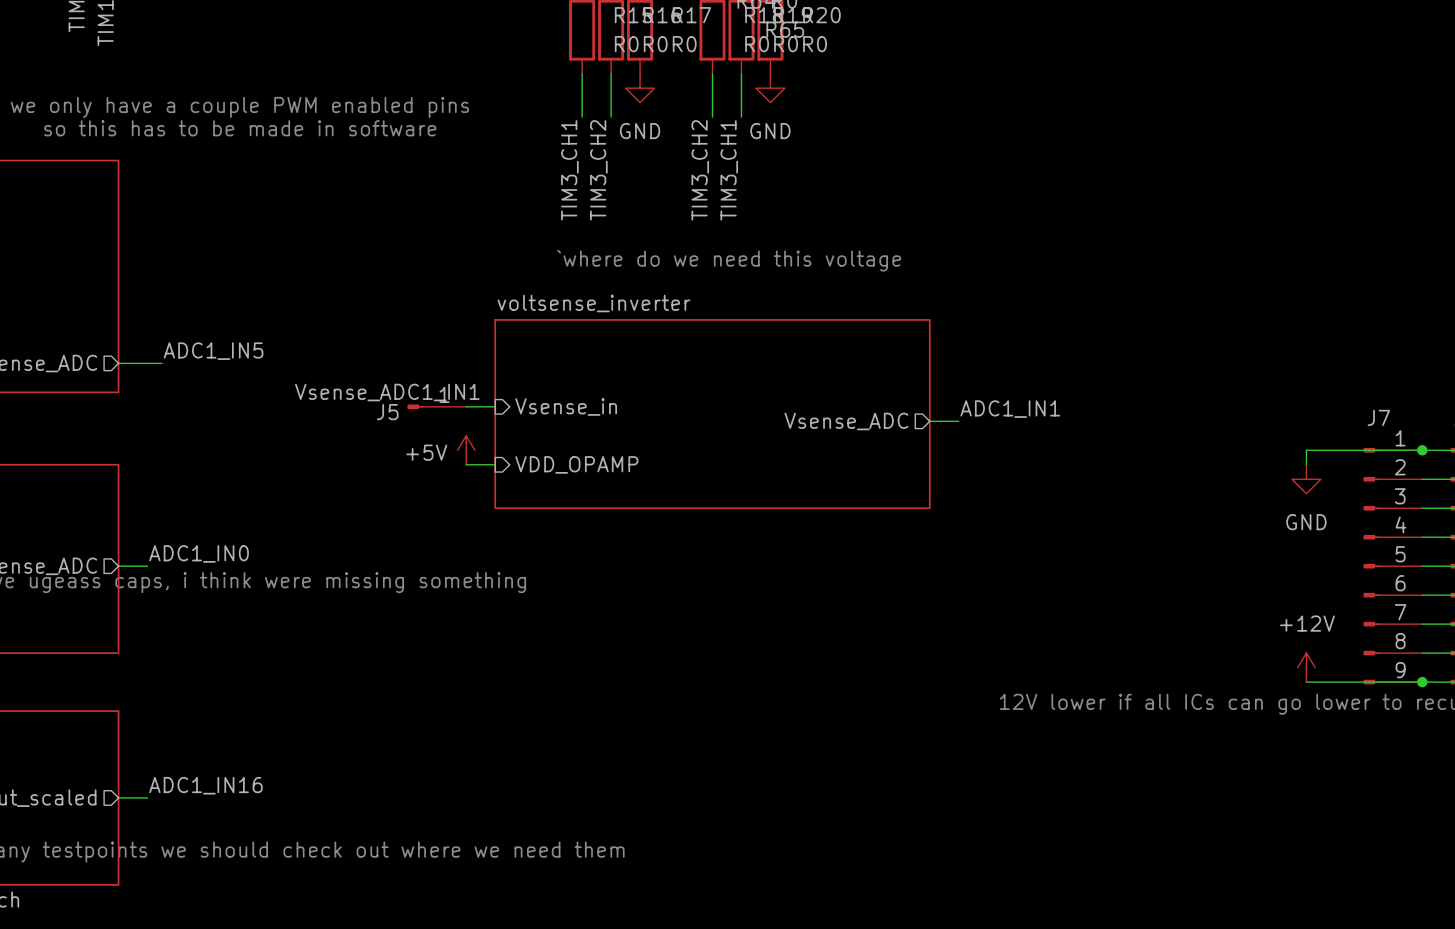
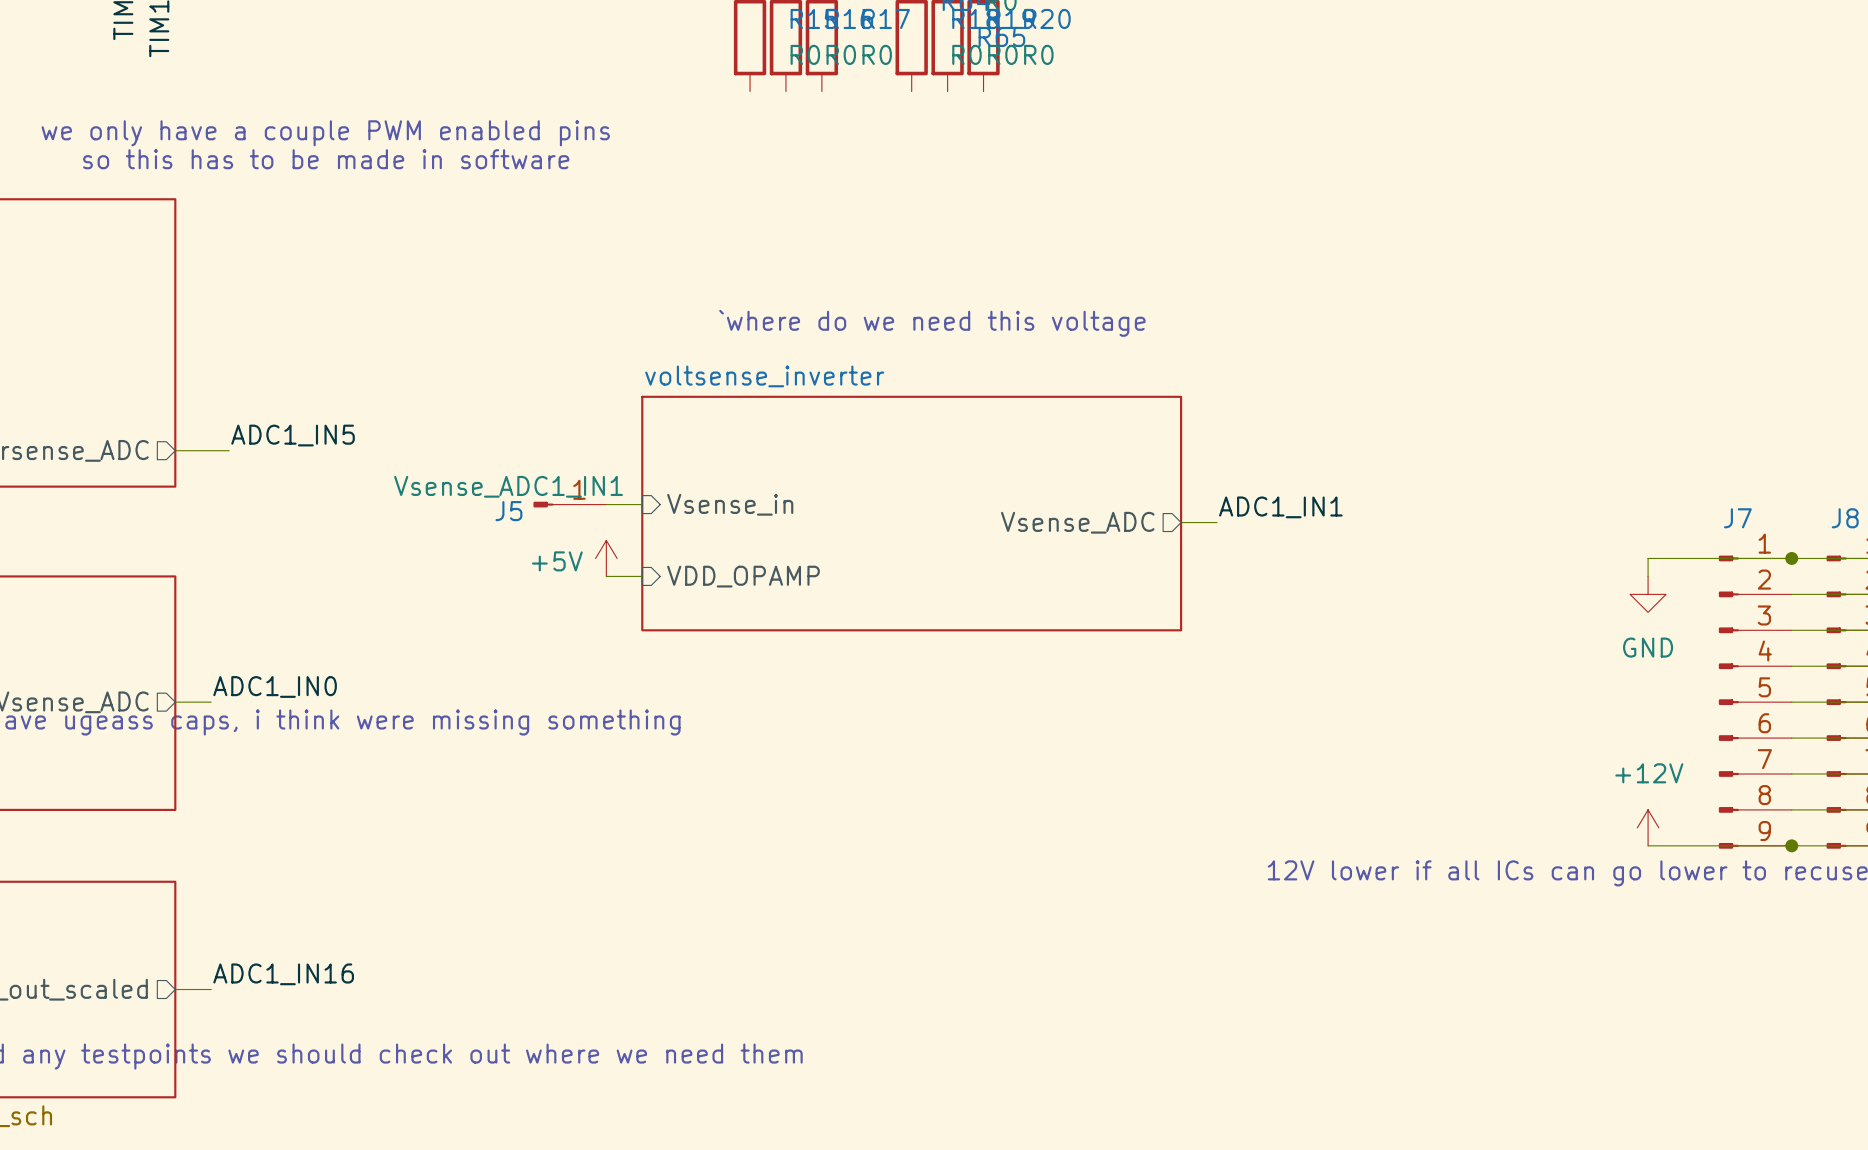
wire: (582, 73) (582, 117) -> none
wire: (611, 73) (611, 117) -> none
wire: (712, 73) (712, 117) -> none
wire: (741, 73) (741, 117) -> none
power symbol: GND (640, 88) -> none
power symbol: GND (770, 88) -> none
label: TIM3_CH1 (569, 170) -> none
label: TIM3_CH2 (598, 170) -> none
label: TIM3_CH2 (700, 170) -> none
label: TIM3_CH1 (729, 170) -> none

